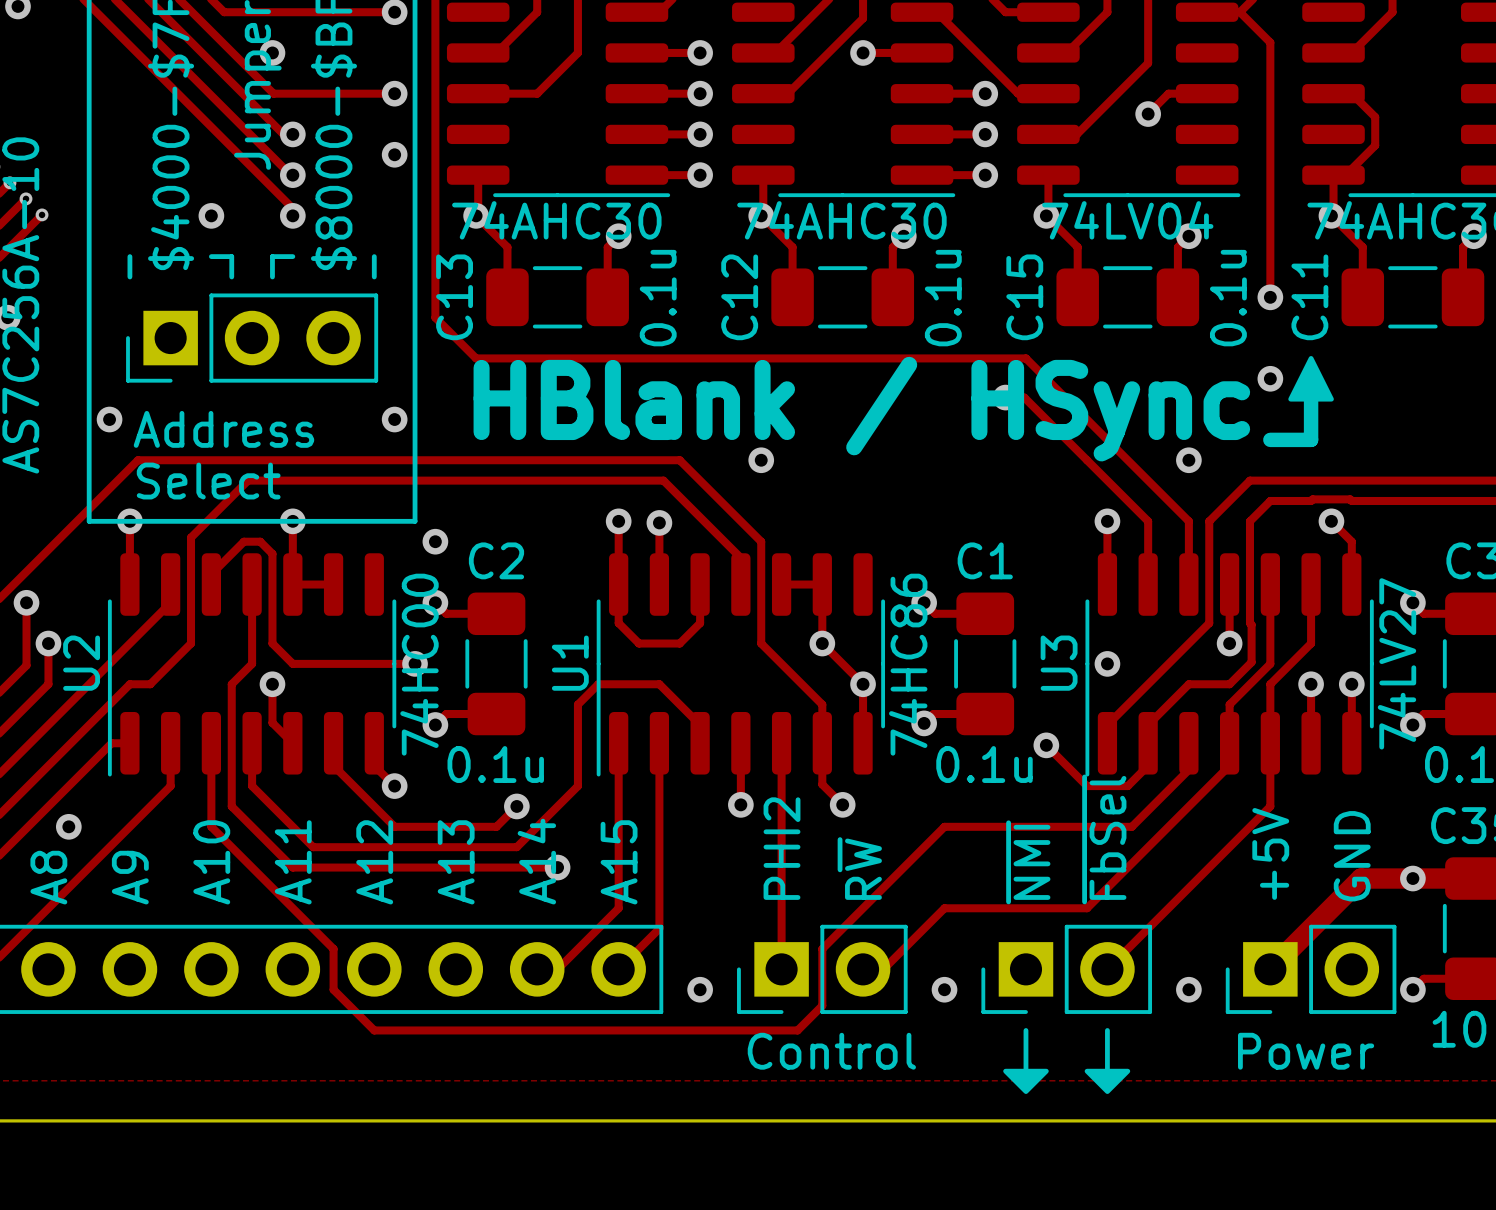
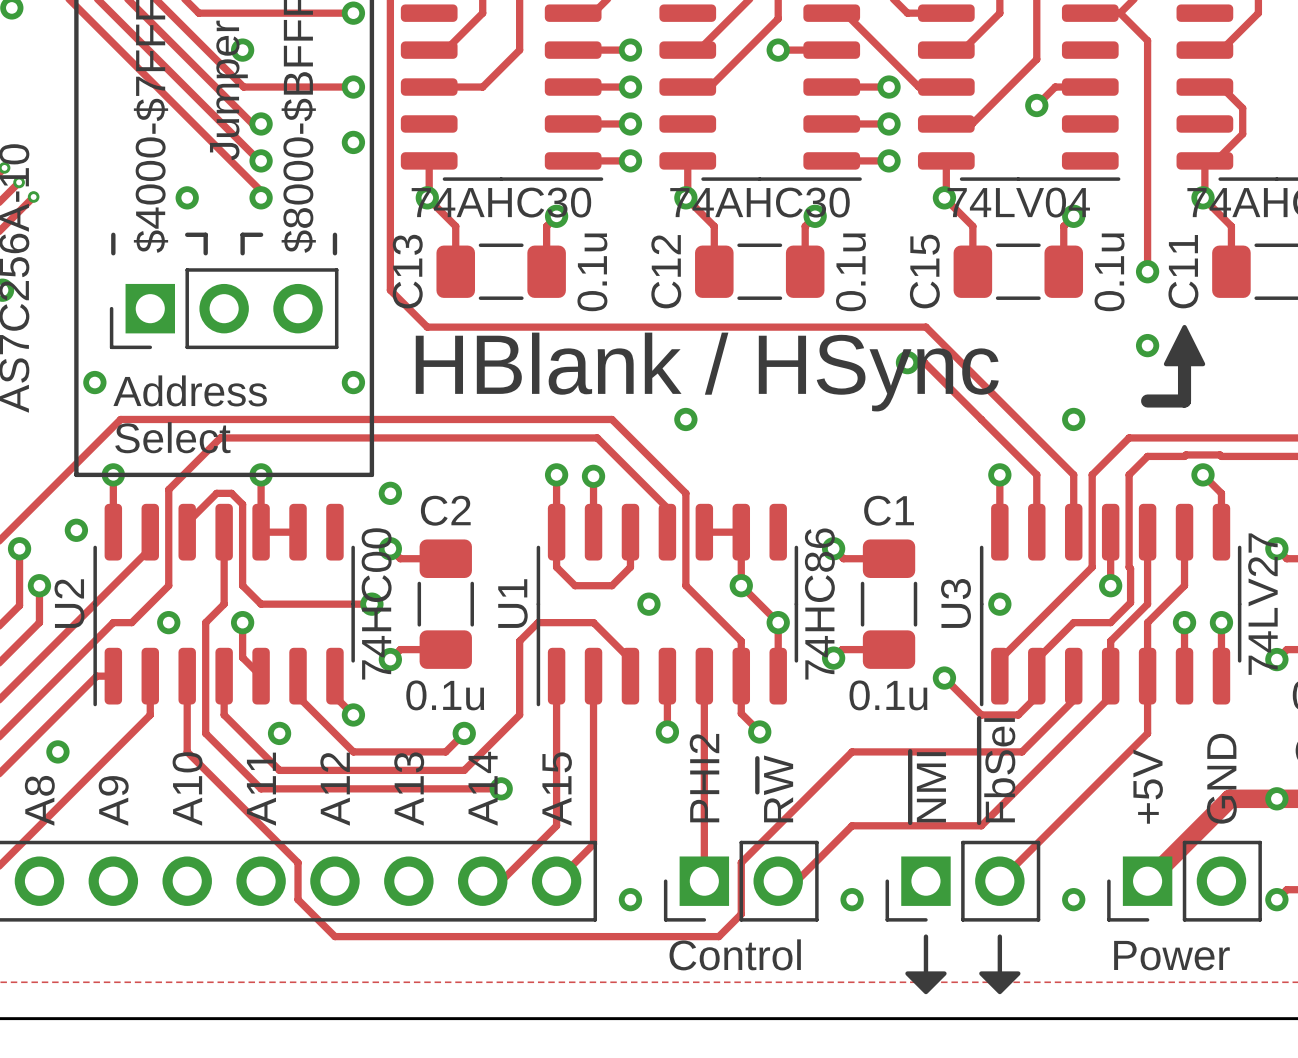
via: none -> (76, 530)
via: none -> (648, 604)
via: none -> (168, 622)
via: none -> (279, 733)

